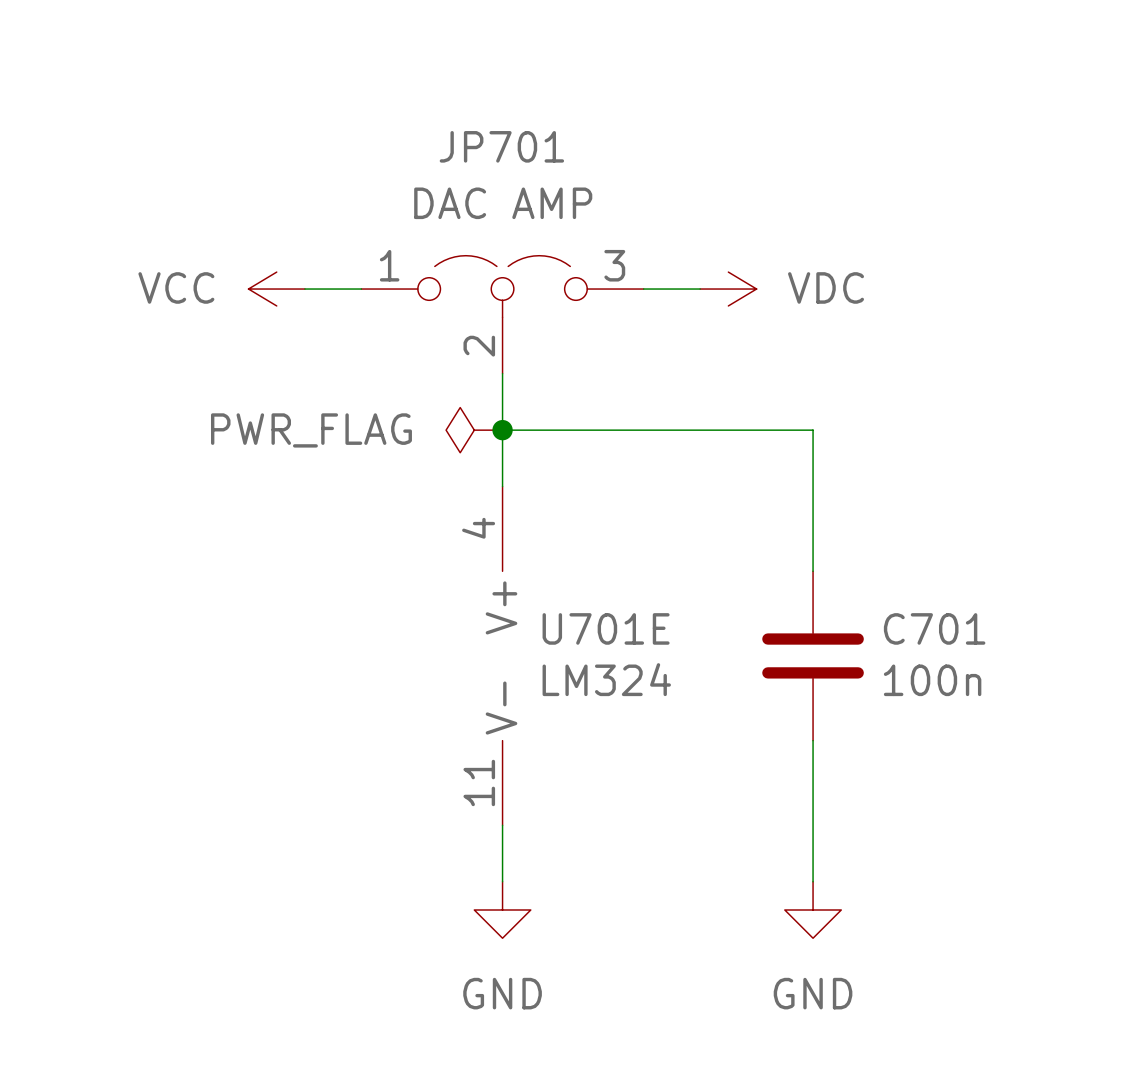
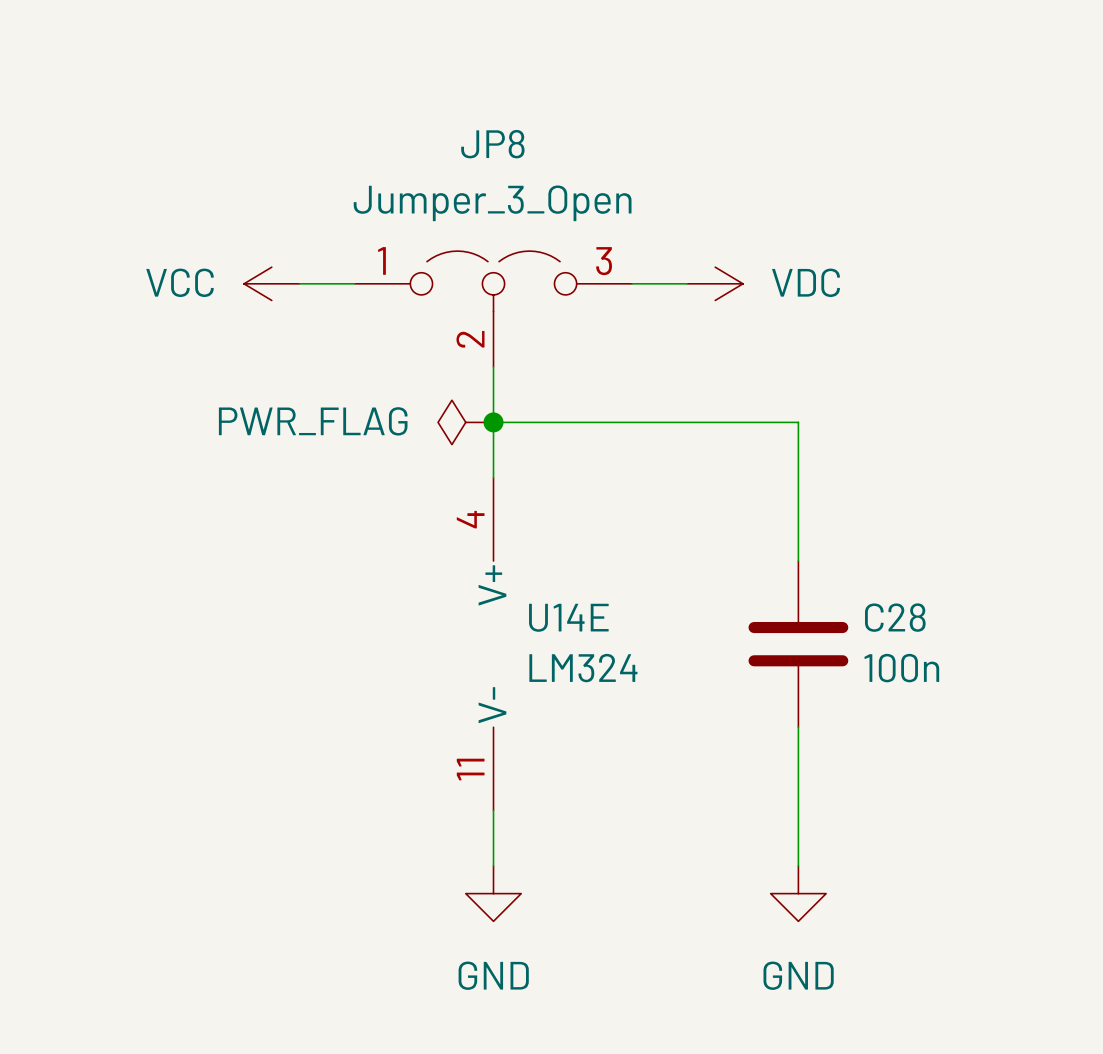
JP701 name: JP701 (501, 146) -> JP8 (492, 144)
JP701 value: DAC AMP (503, 203) -> Jumper_3_Open (492, 203)
U701E name: U701E (606, 628) -> U14E (568, 617)
C701 name: C701 (934, 628) -> C28 (895, 617)

